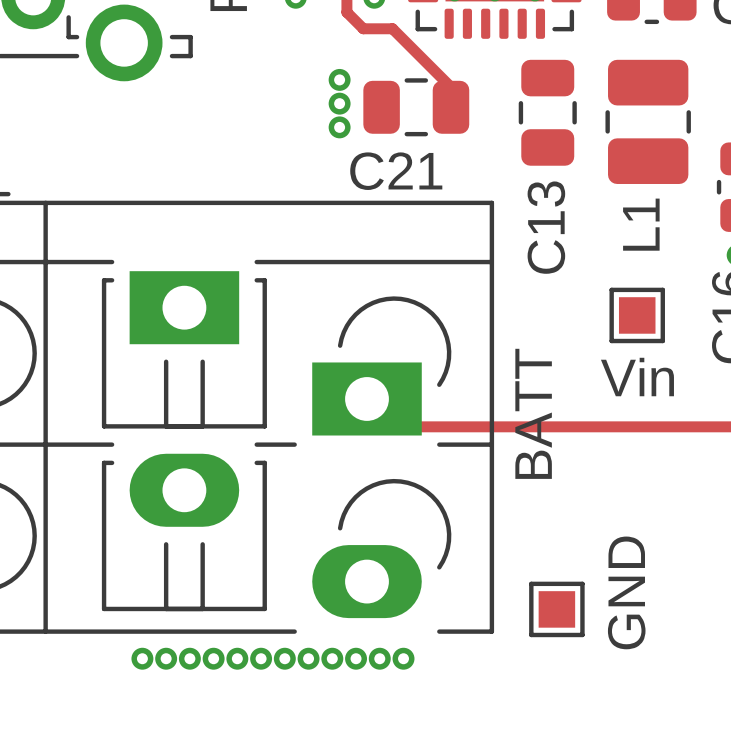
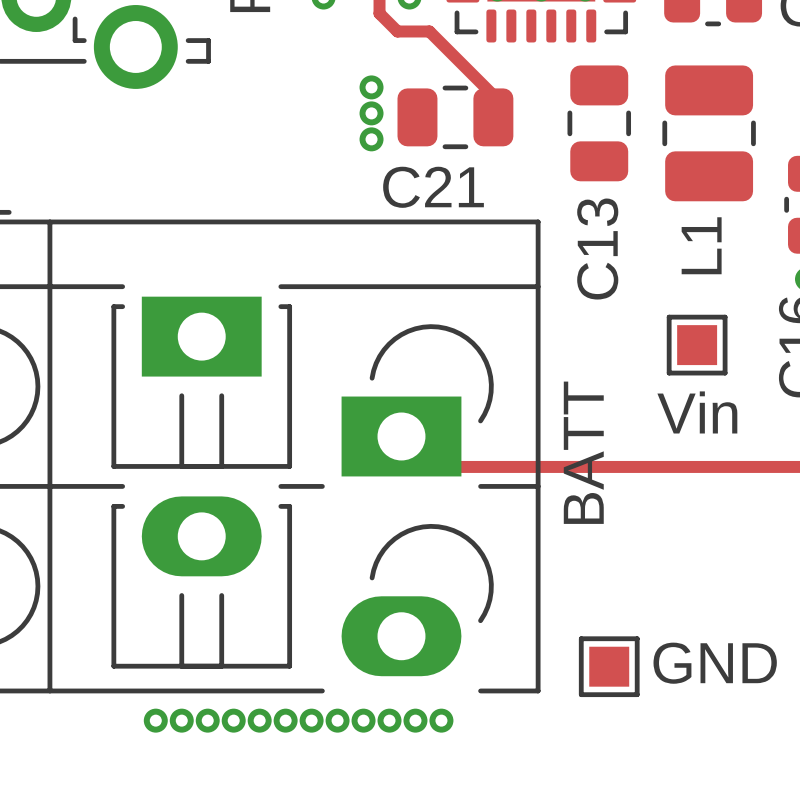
part value rotation: 0° (626, 592) -> 90° clockwise (715, 663)

